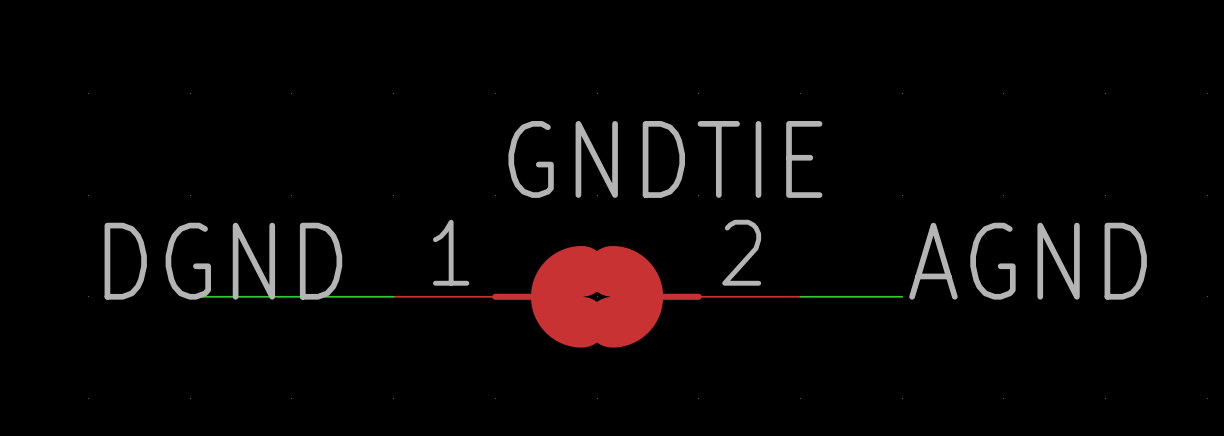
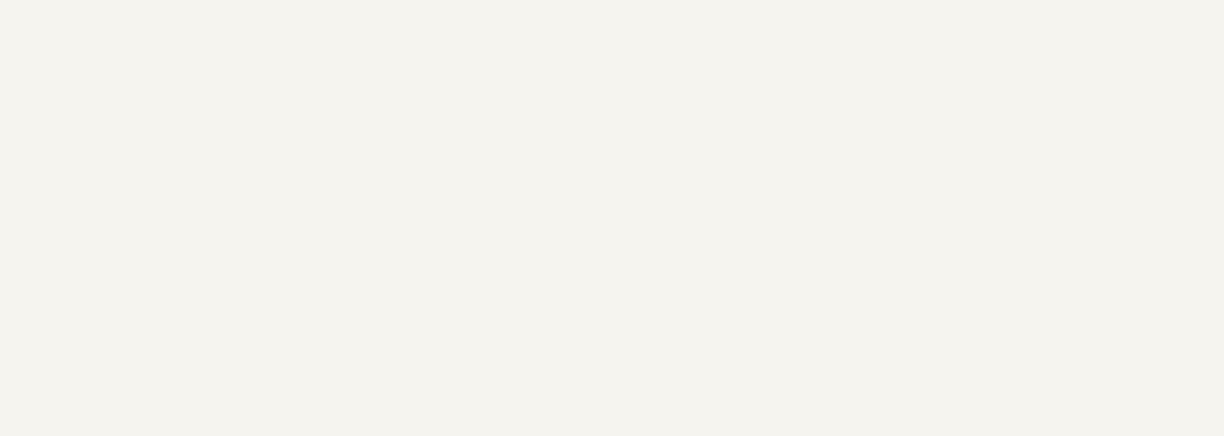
label: DGND (223, 261) -> none
label: AGND (1028, 261) -> none
wire: (190, 296) (393, 296) -> none
GNDTIE: (597, 296) -> none
wire: (800, 296) (902, 296) -> none

